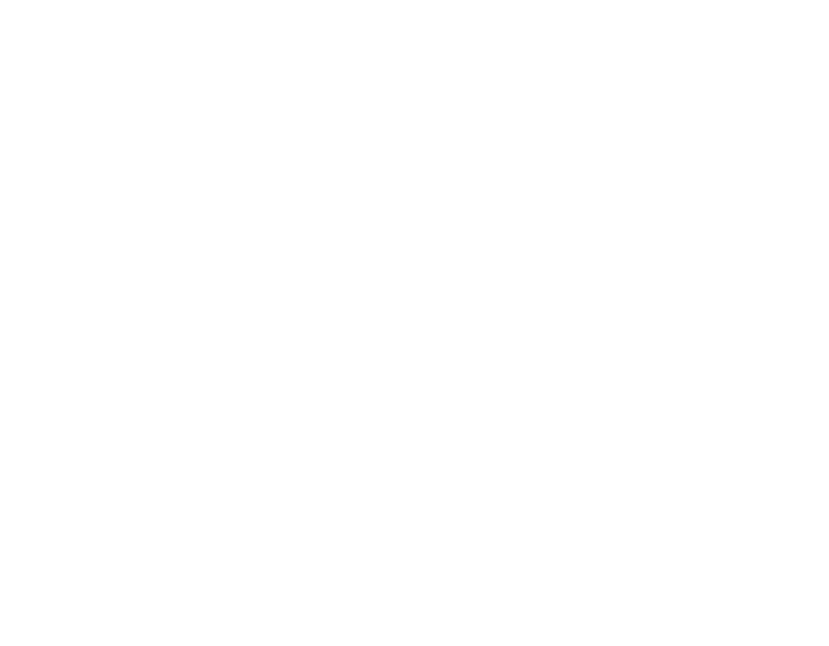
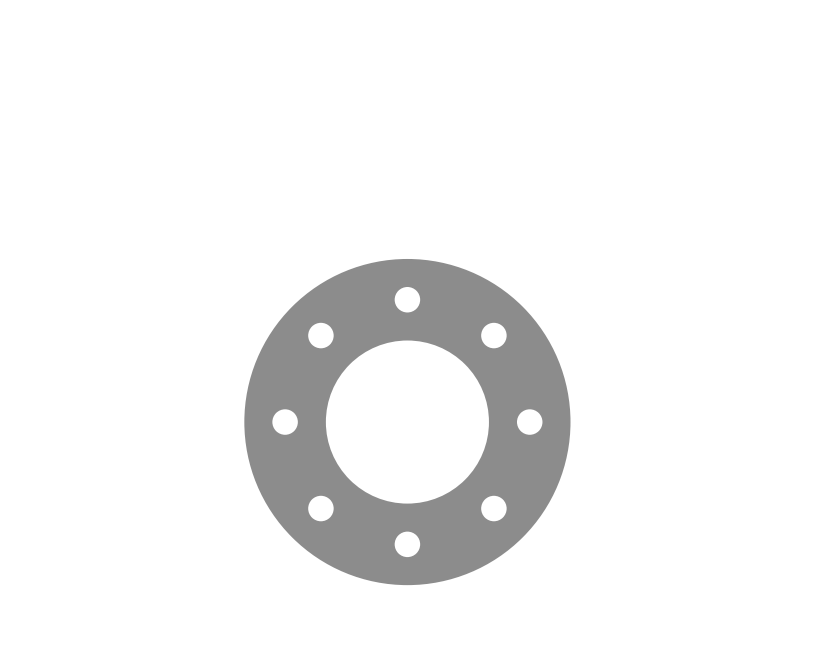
part: none -> (407, 422)

